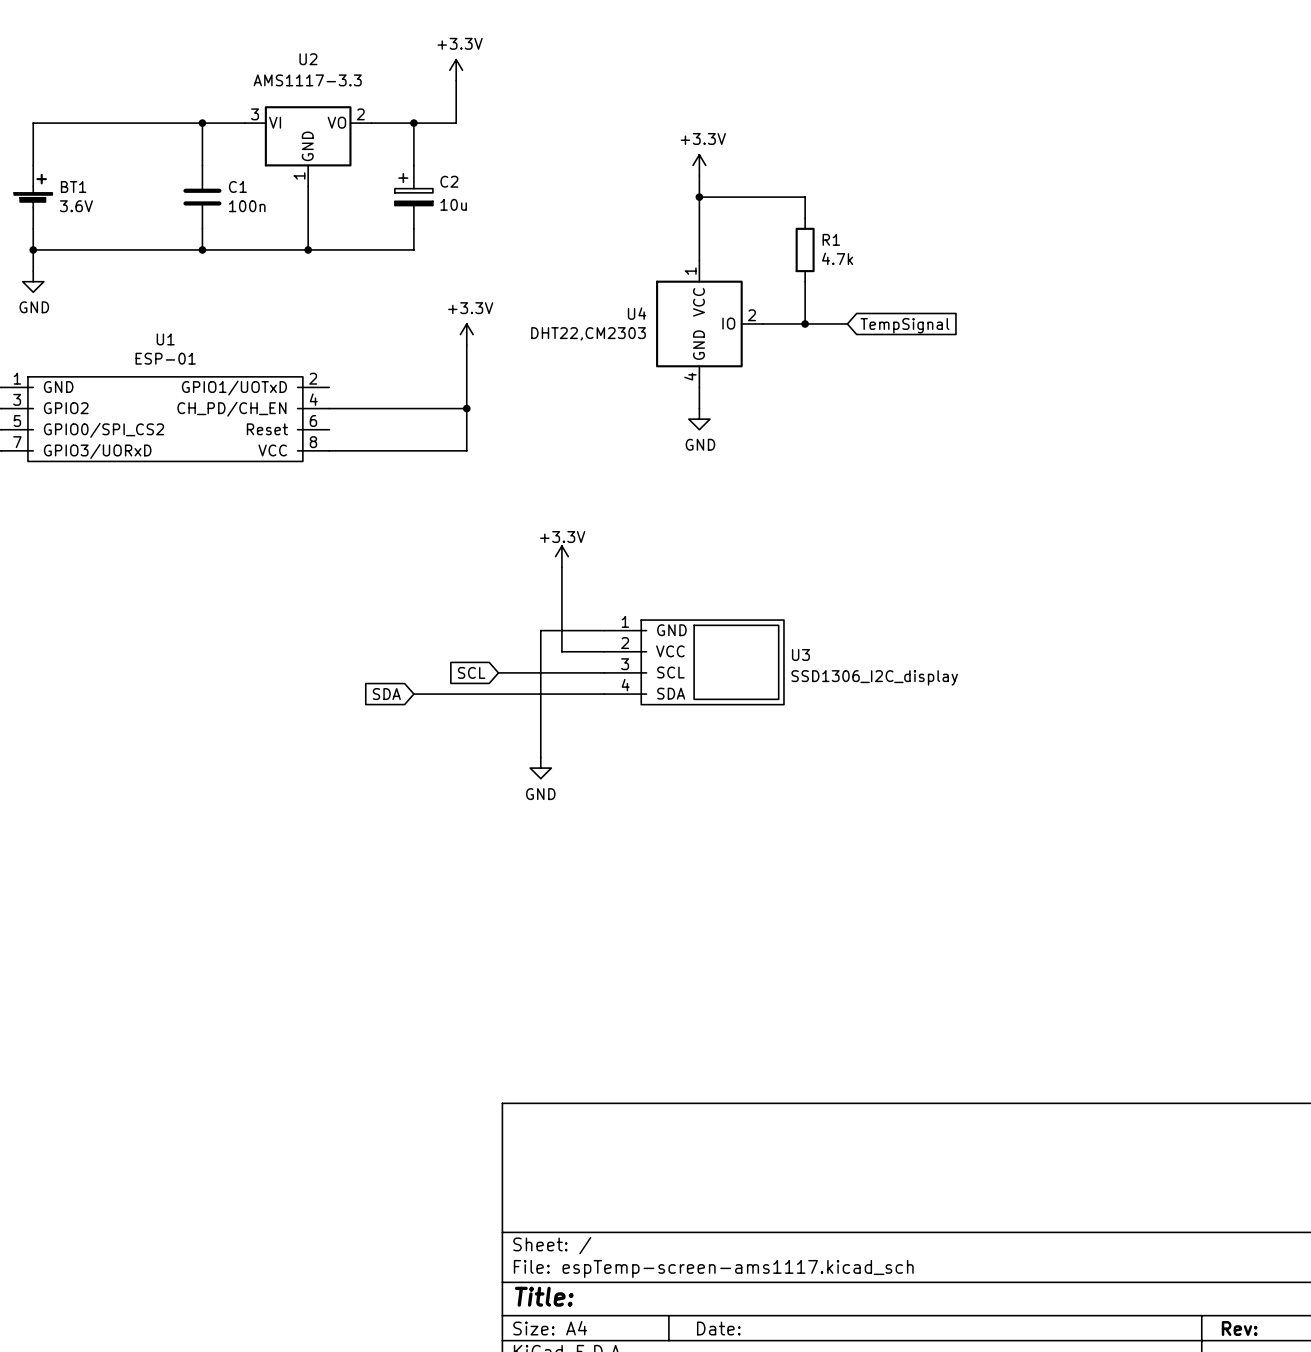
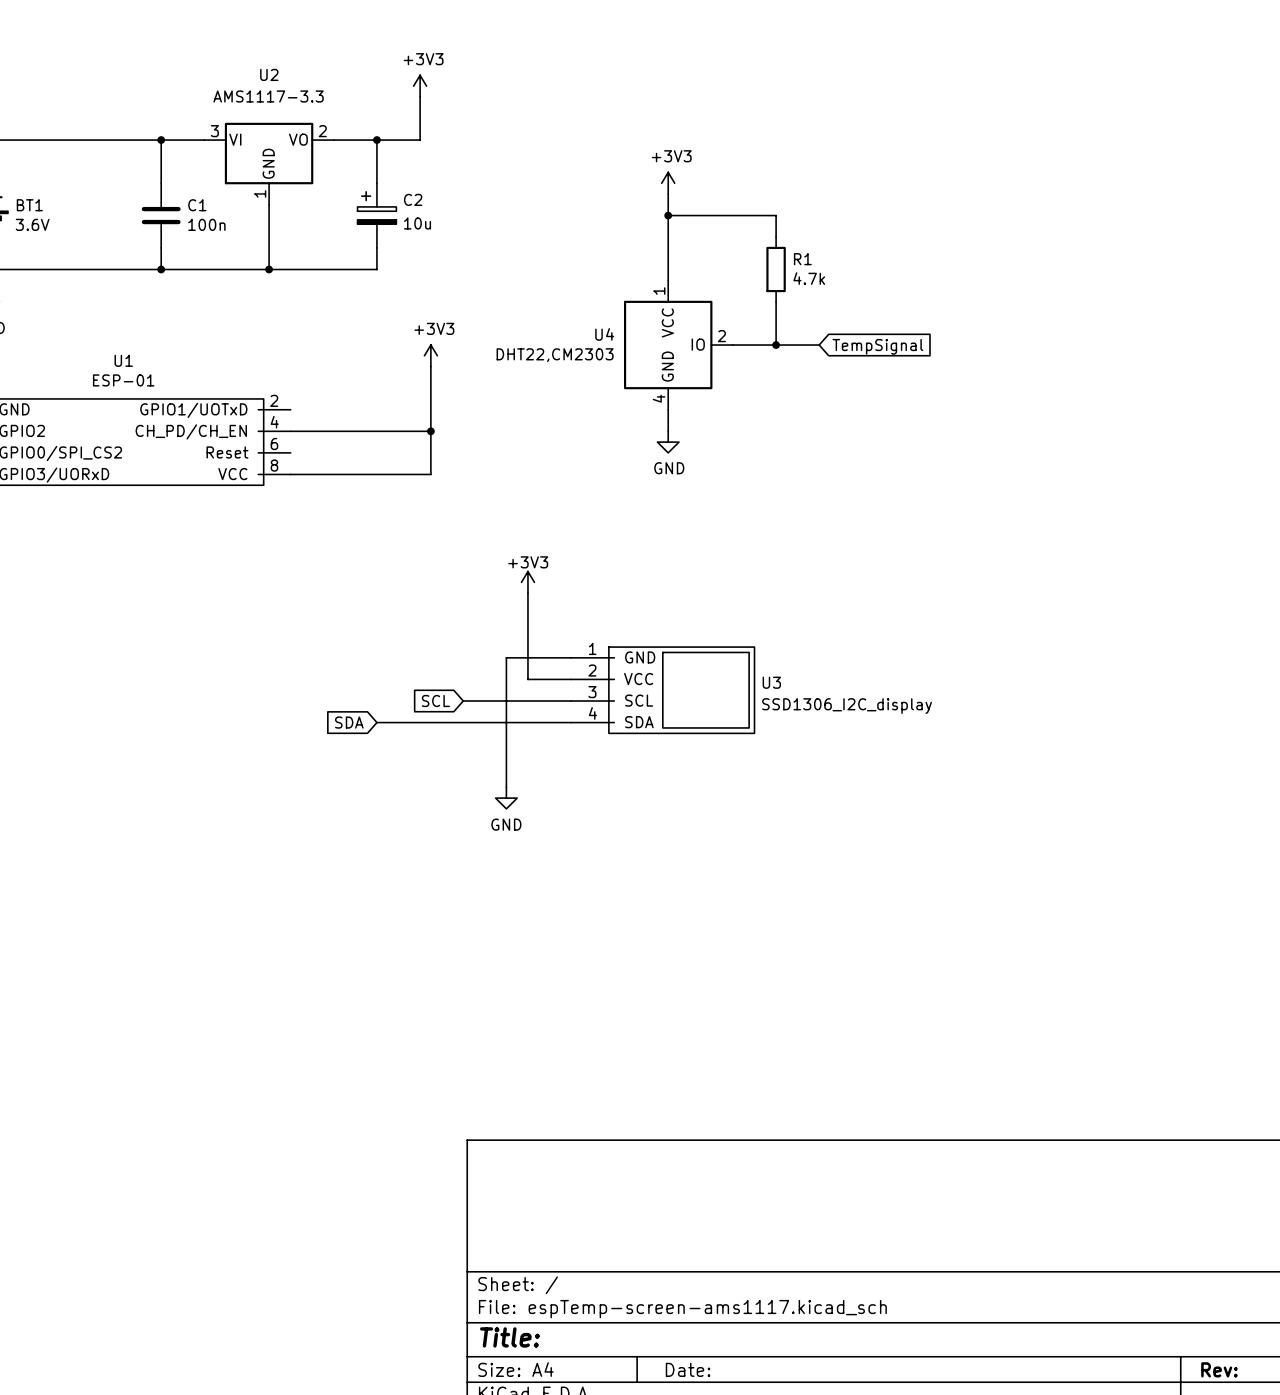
power symbol: +3.3V (456, 70) -> +3V3 (420, 86)
power symbol: +3.3V (699, 165) -> +3V3 (668, 183)
power symbol: +3.3V (466, 334) -> +3V3 (430, 355)
power symbol: +3.3V (561, 556) -> +3V3 (527, 582)

